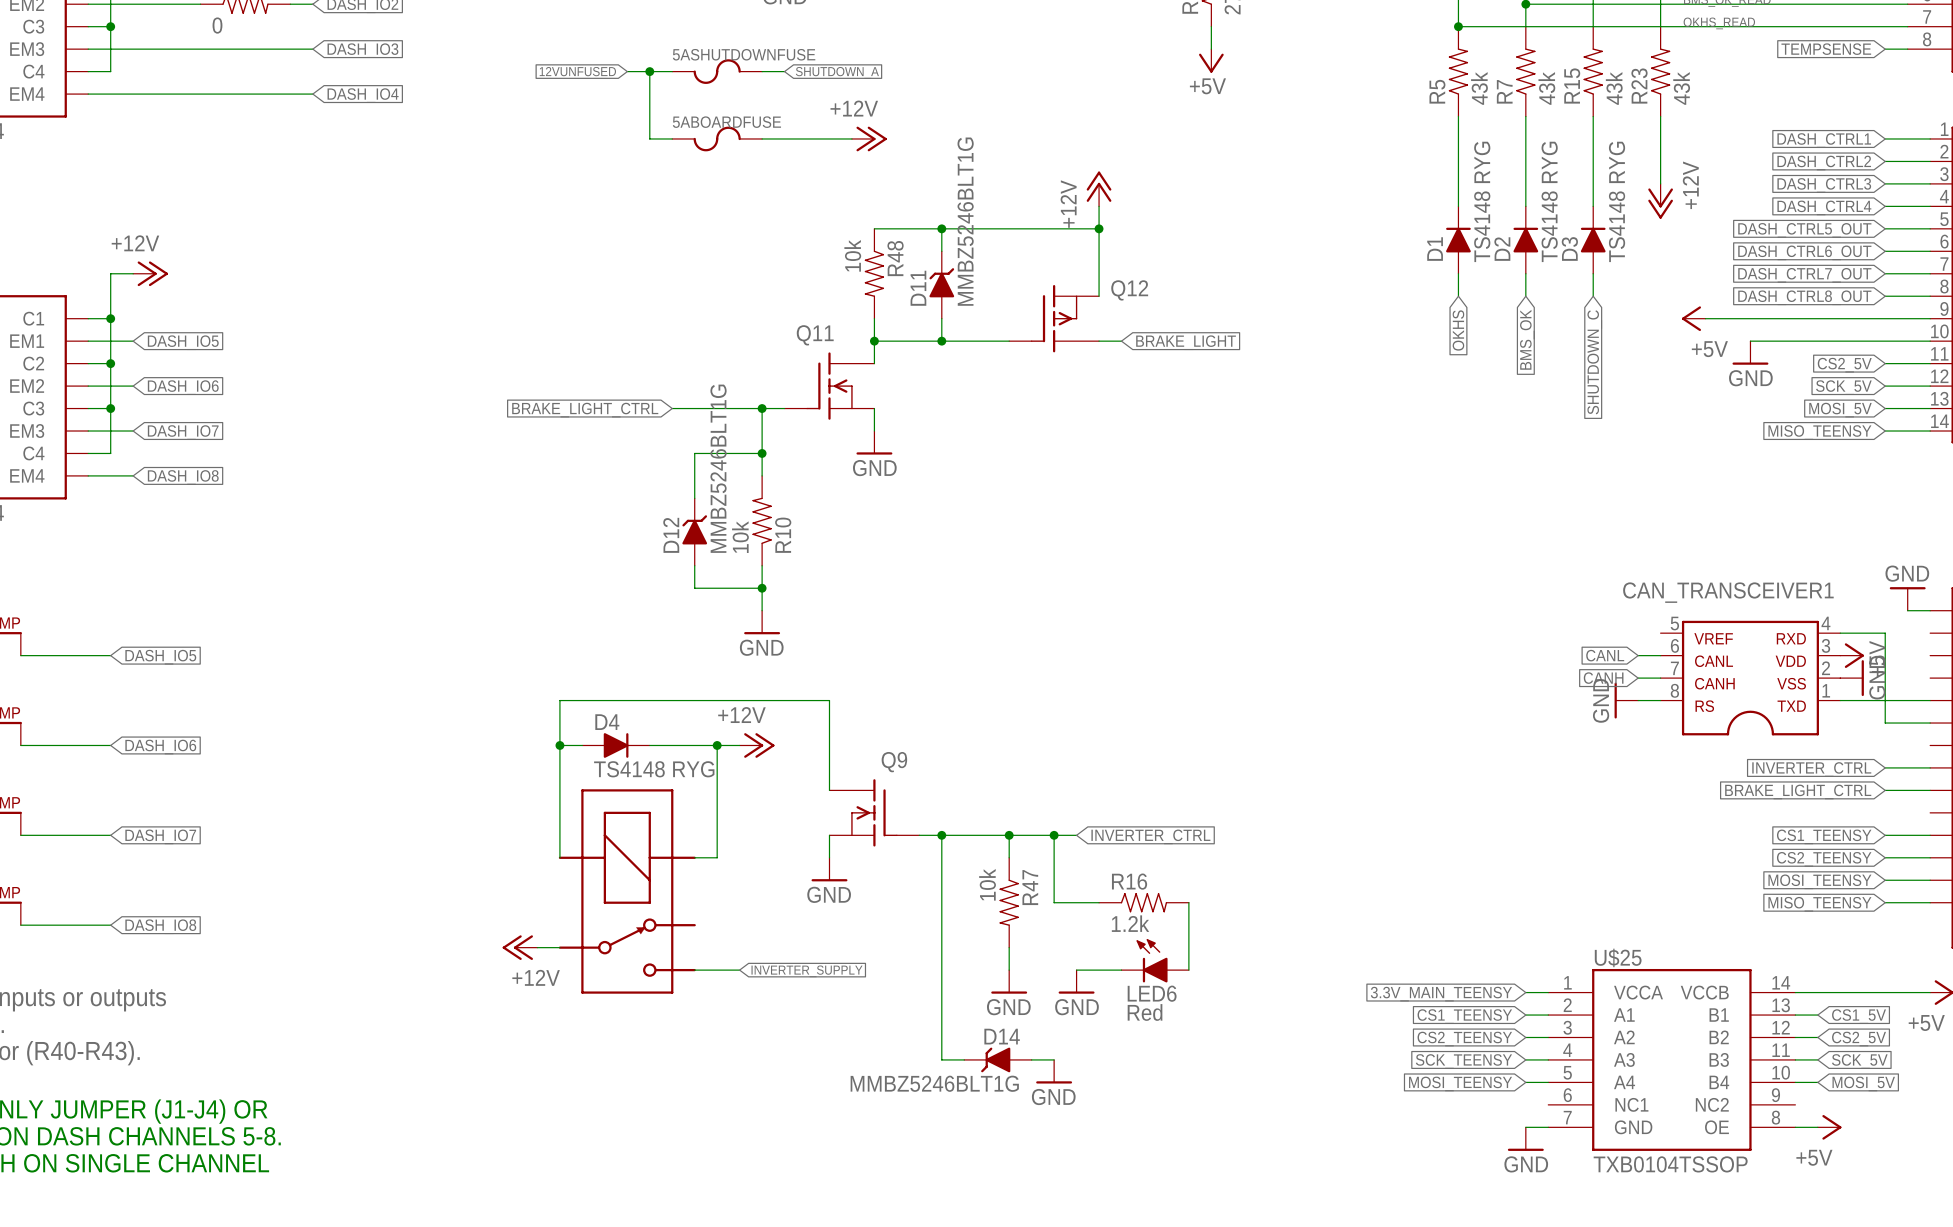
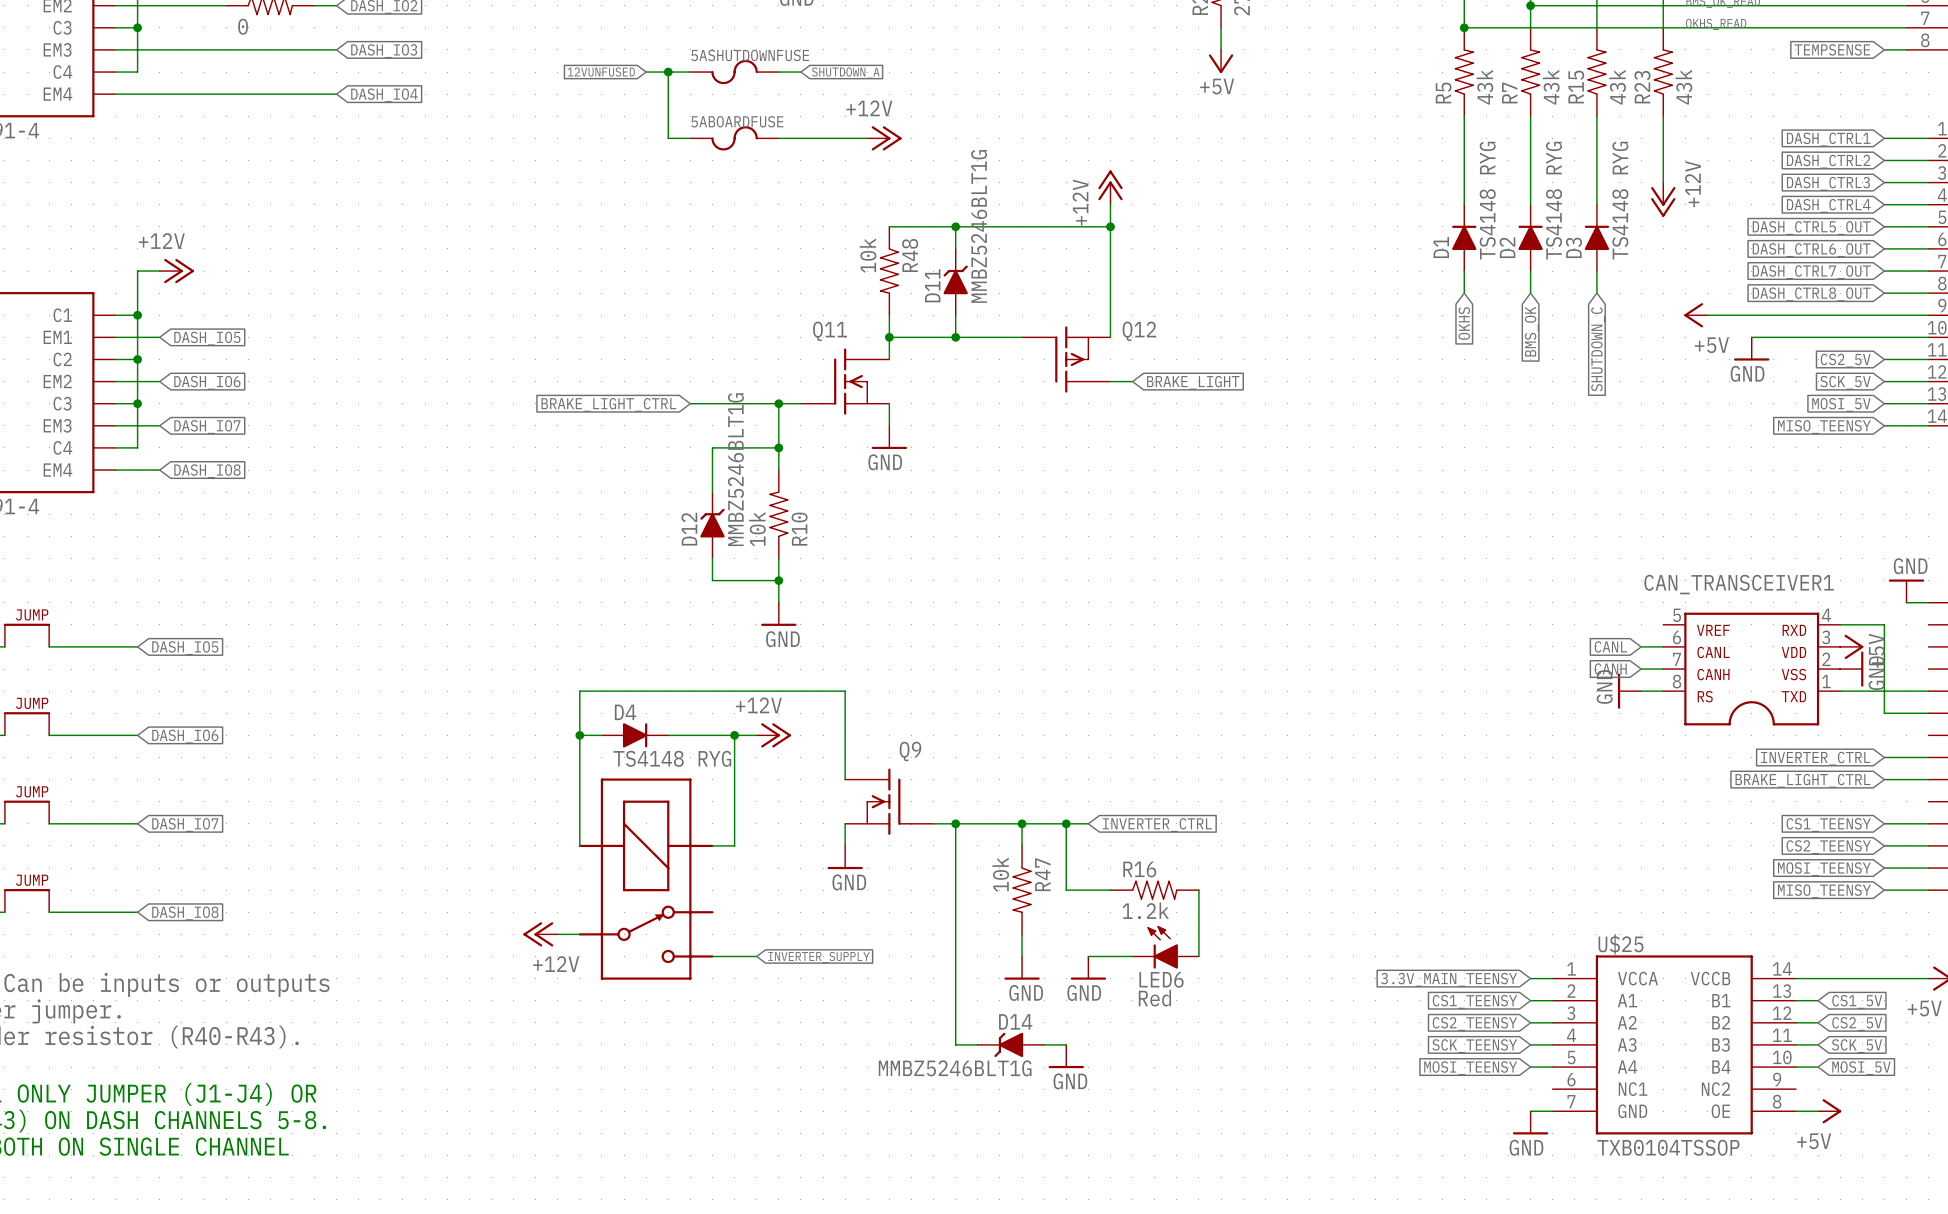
Q12 symbol: [1009, 284, 1100, 353] -> [1022, 326, 1111, 393]
wire: (1099, 341) (1121, 341) -> (1110, 337) (1110, 293)
global label position: BRAKE_LIGHT (1186, 342) -> BRAKE_LIGHT (1193, 382)
wire: none -> (1110, 381) (1132, 381)

